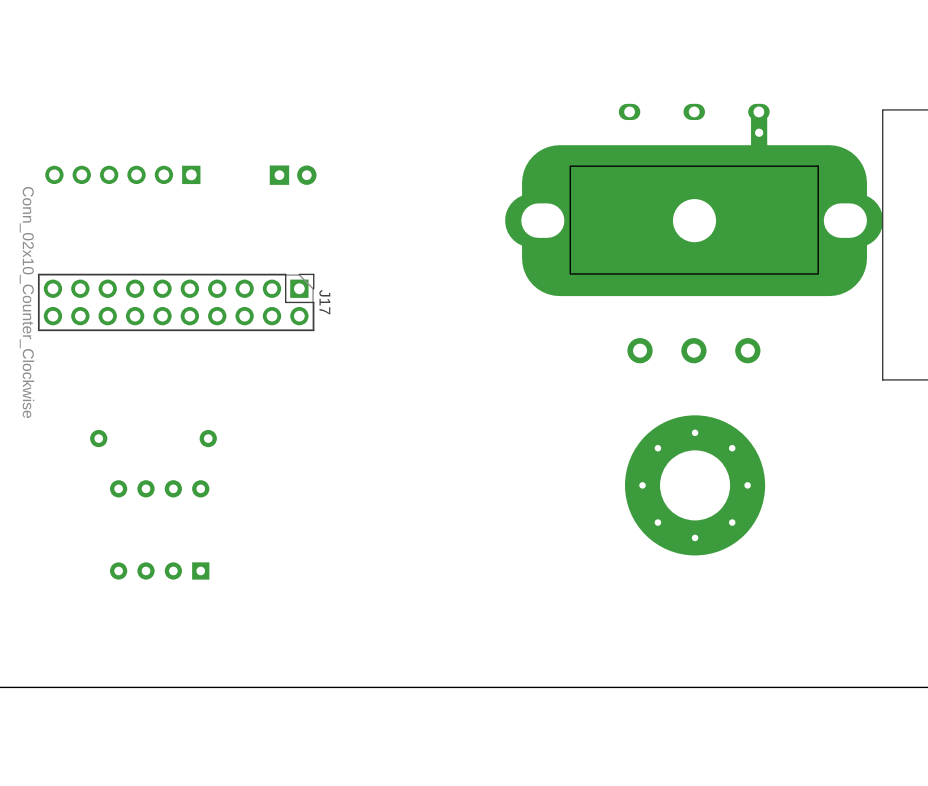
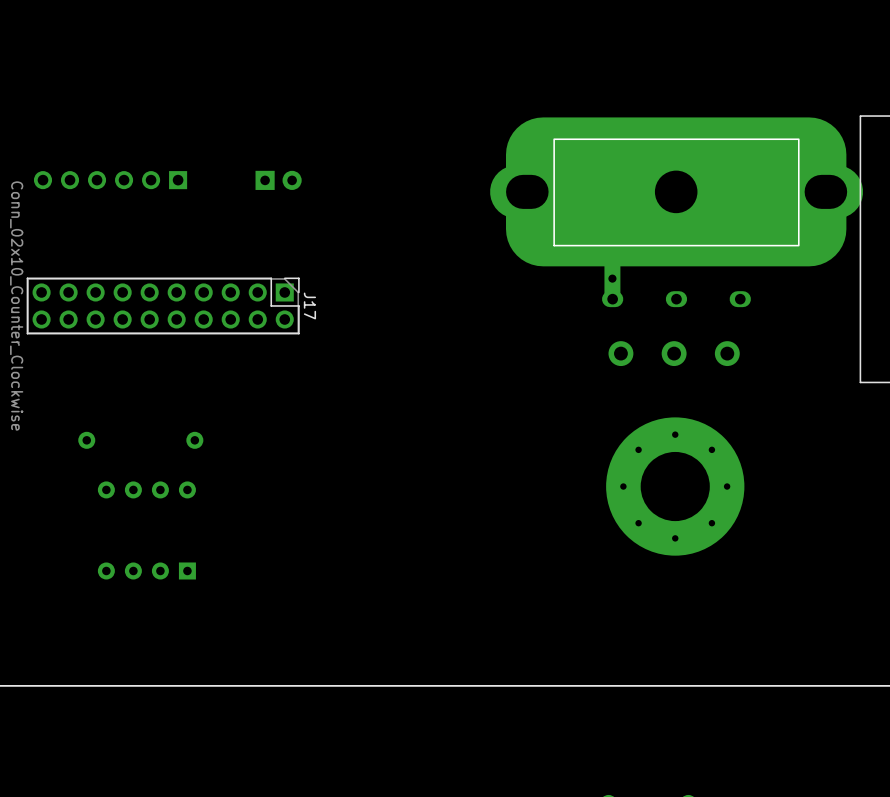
part footprint: [505, 103, 884, 297] -> [490, 117, 864, 308]

